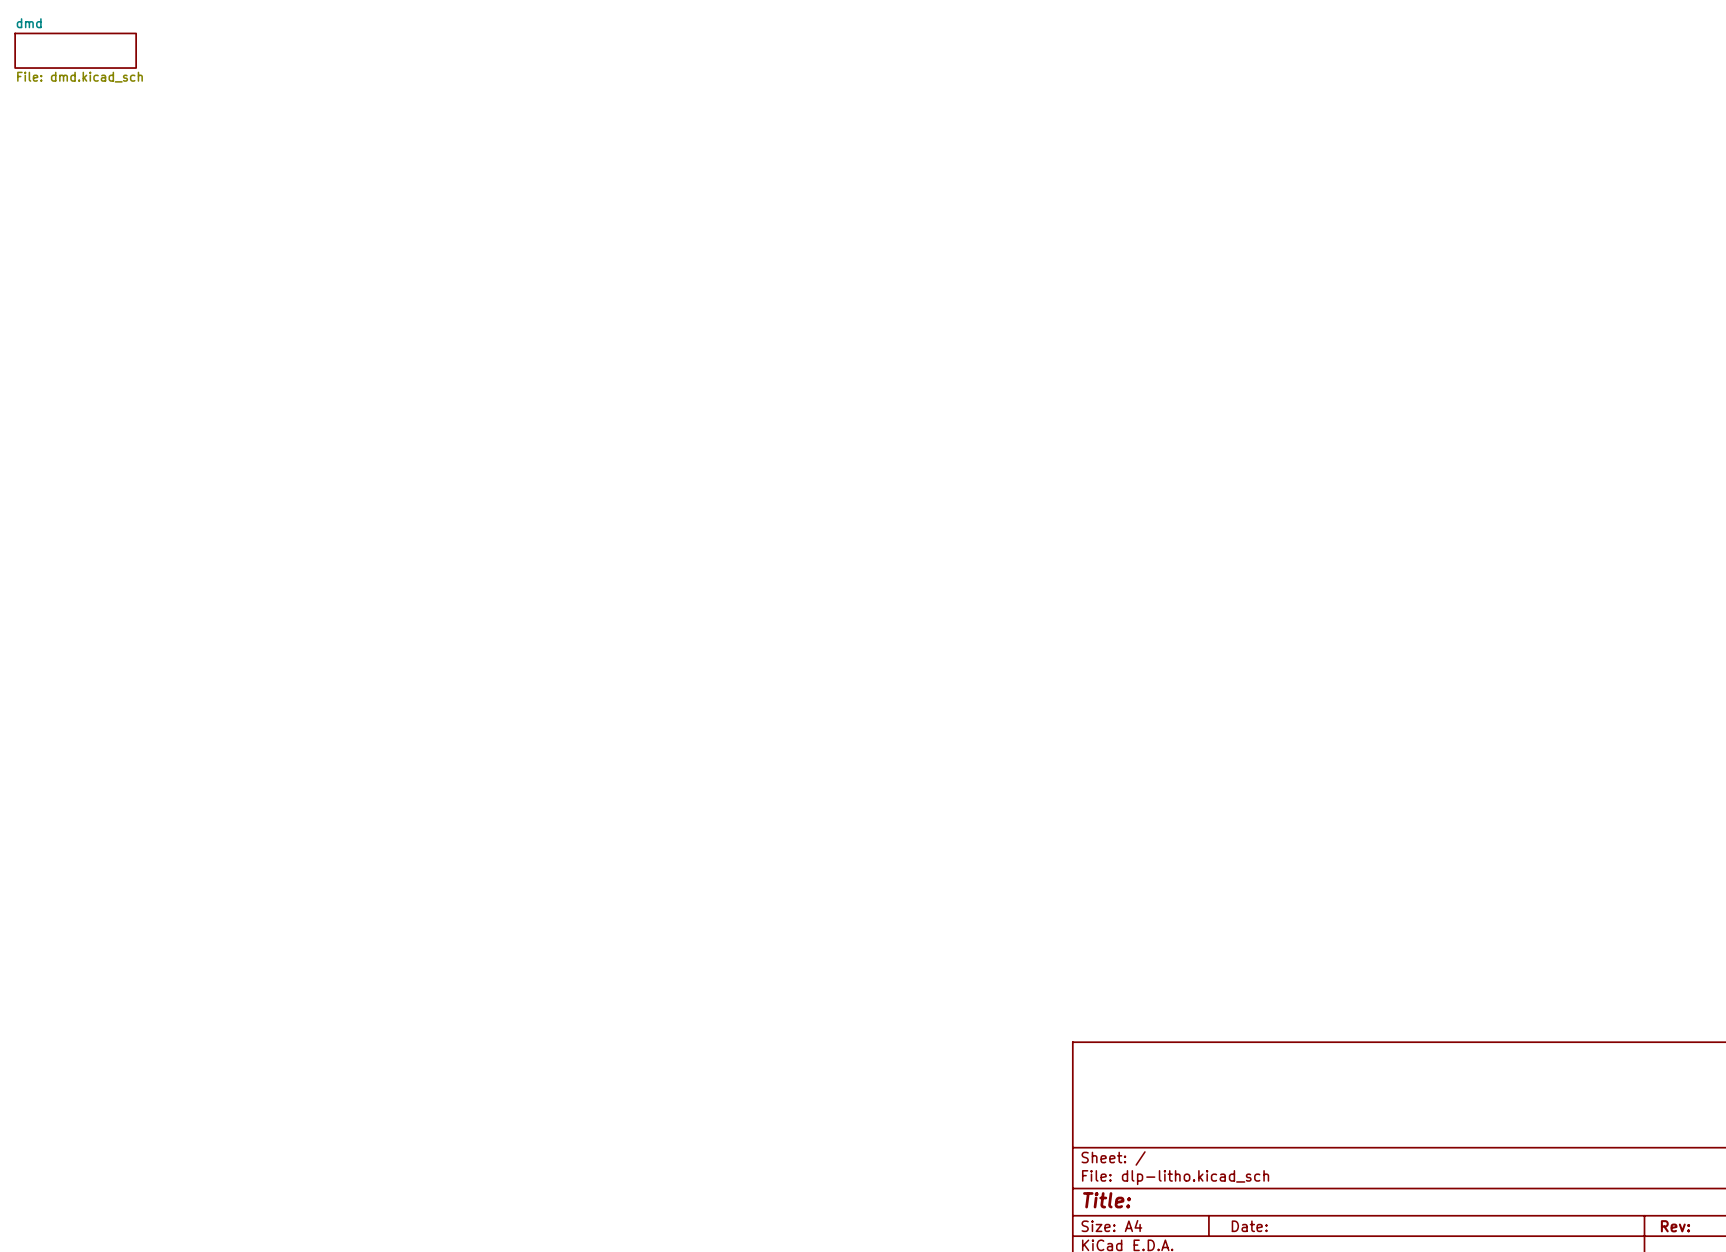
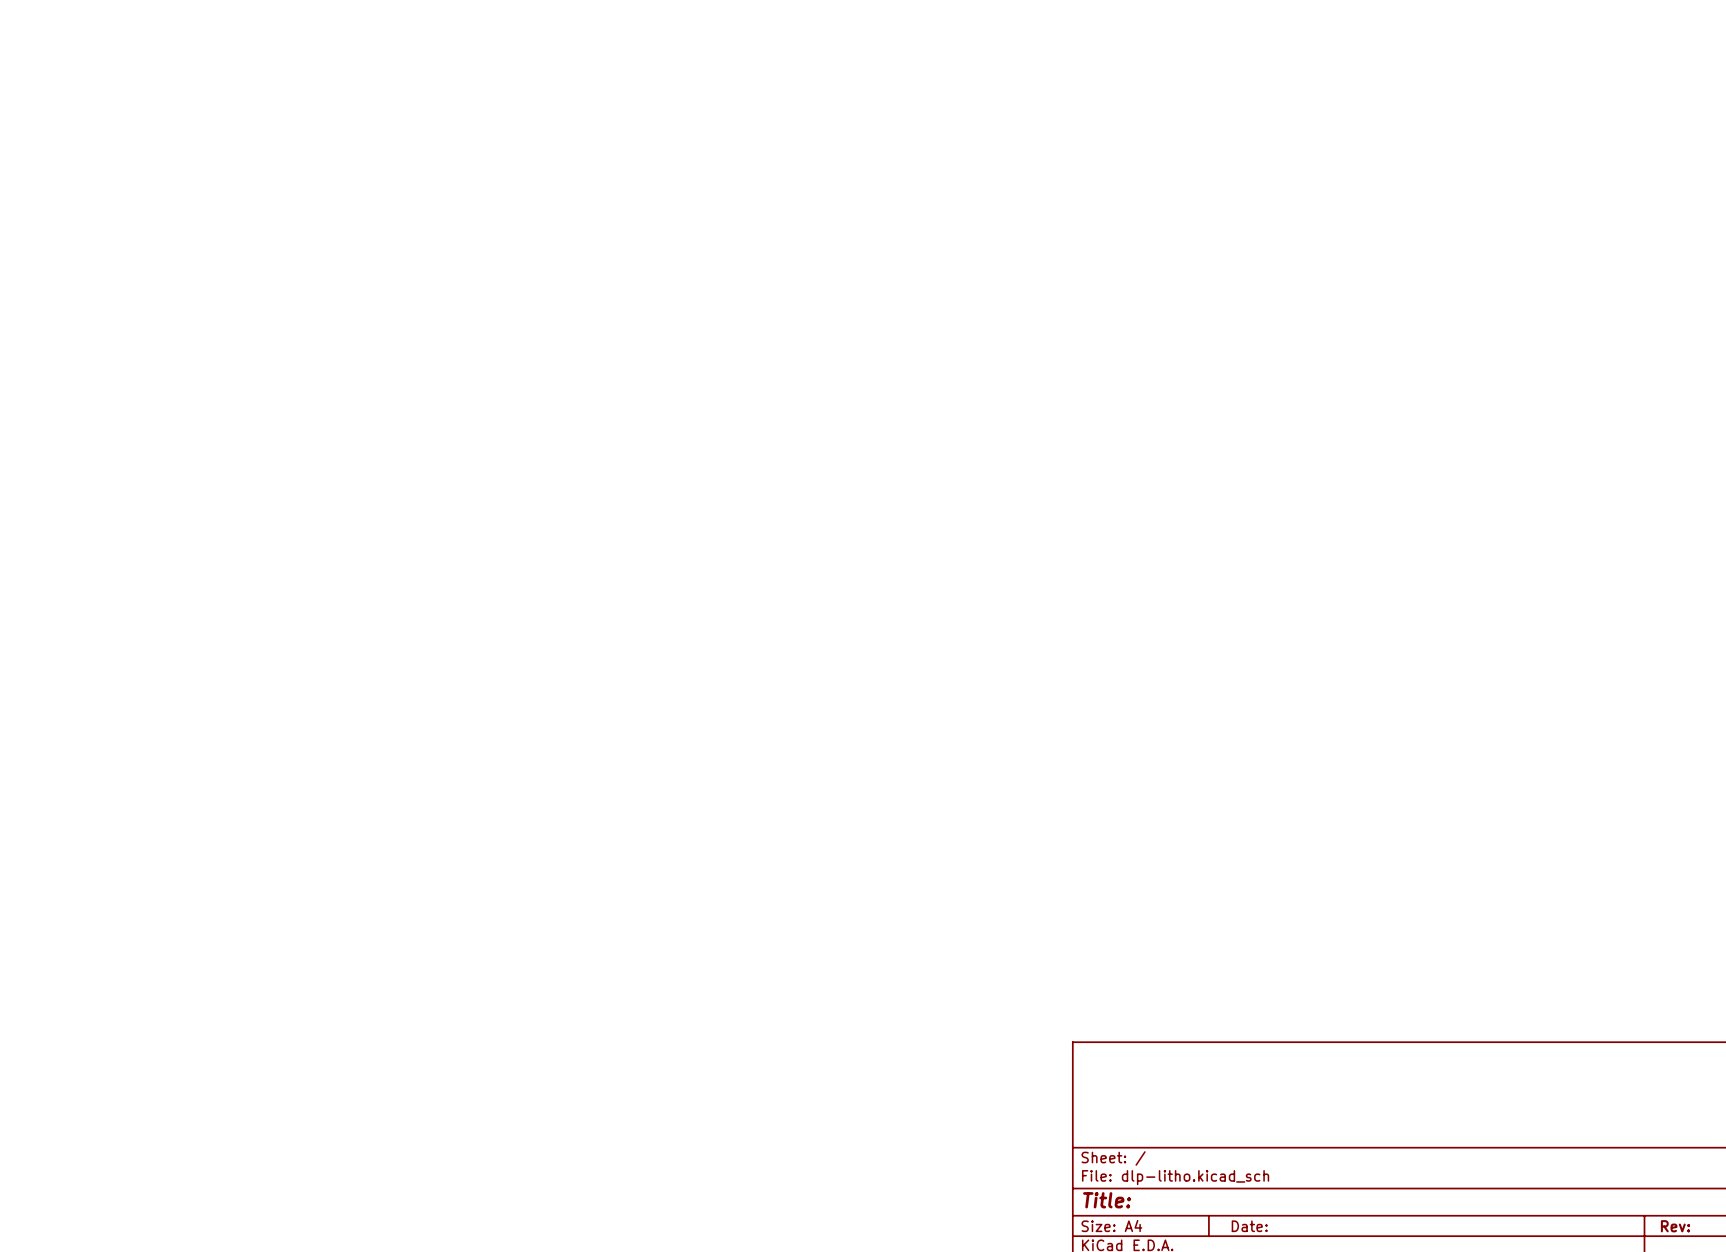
sheet dmd: File: dmd.kicad_sch (75, 50) -> none

